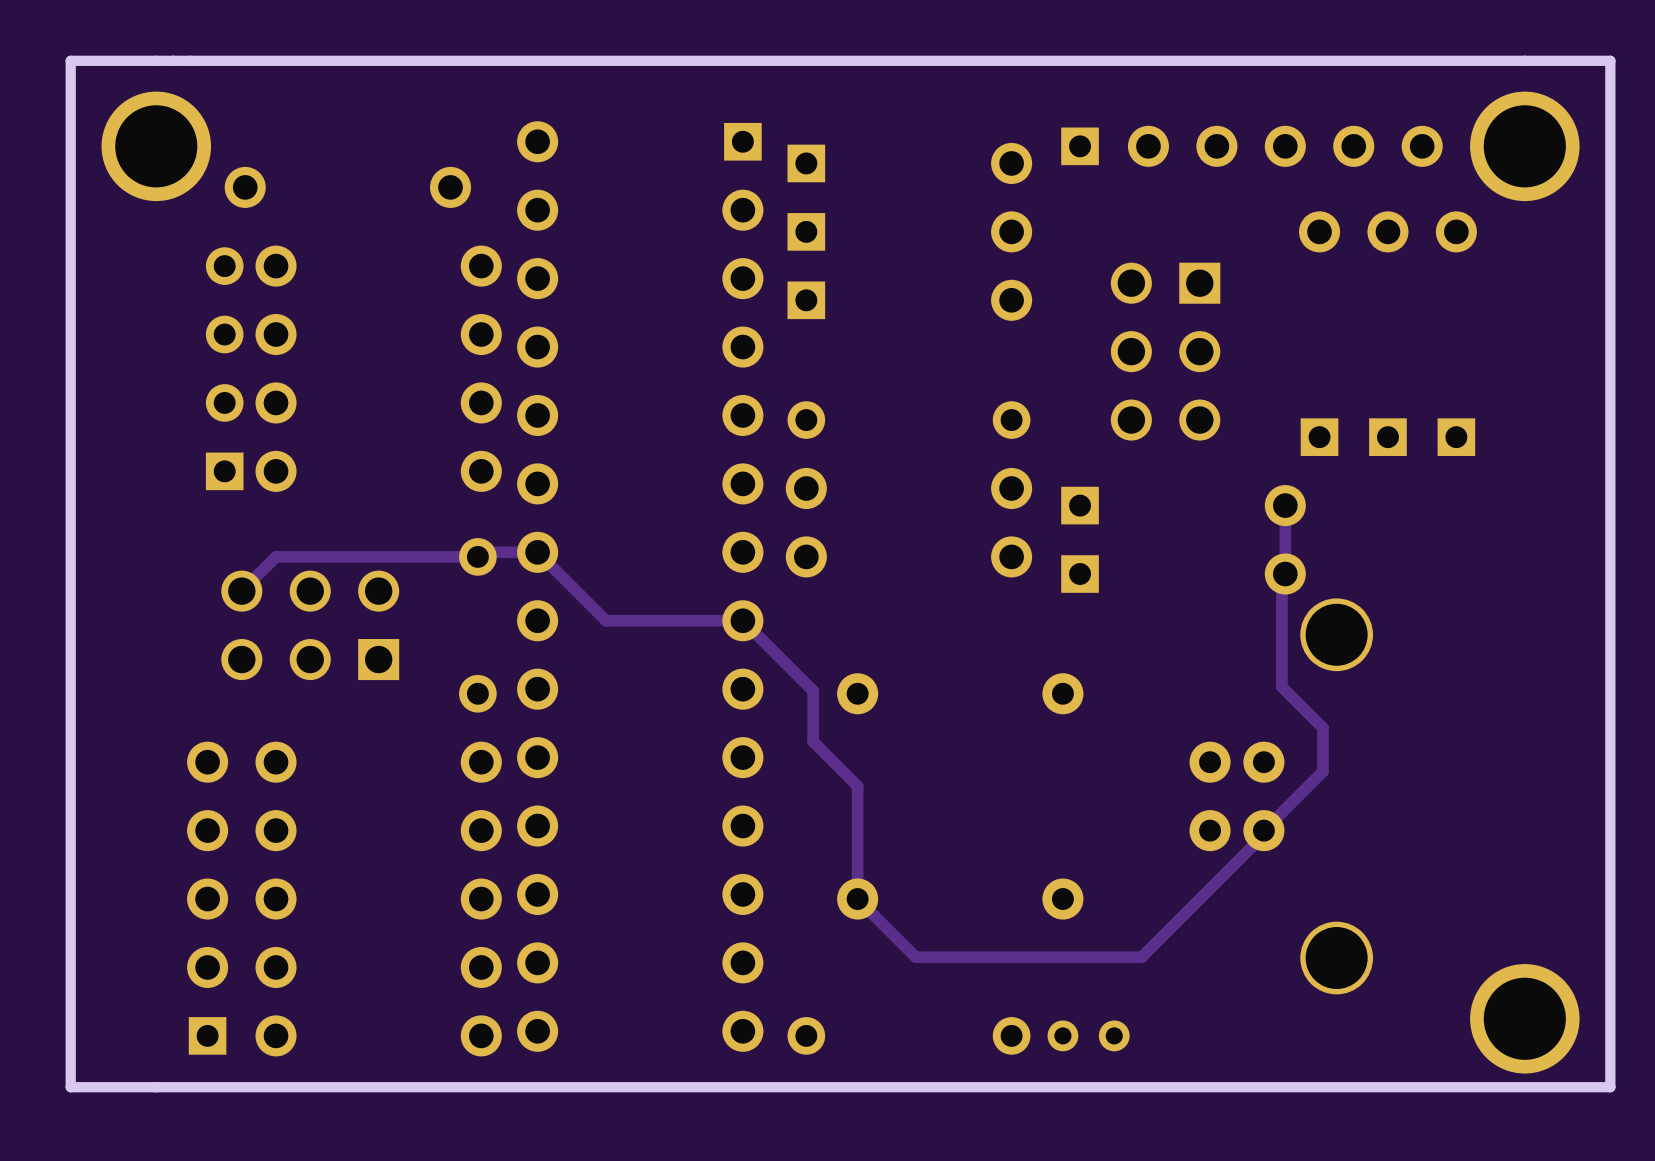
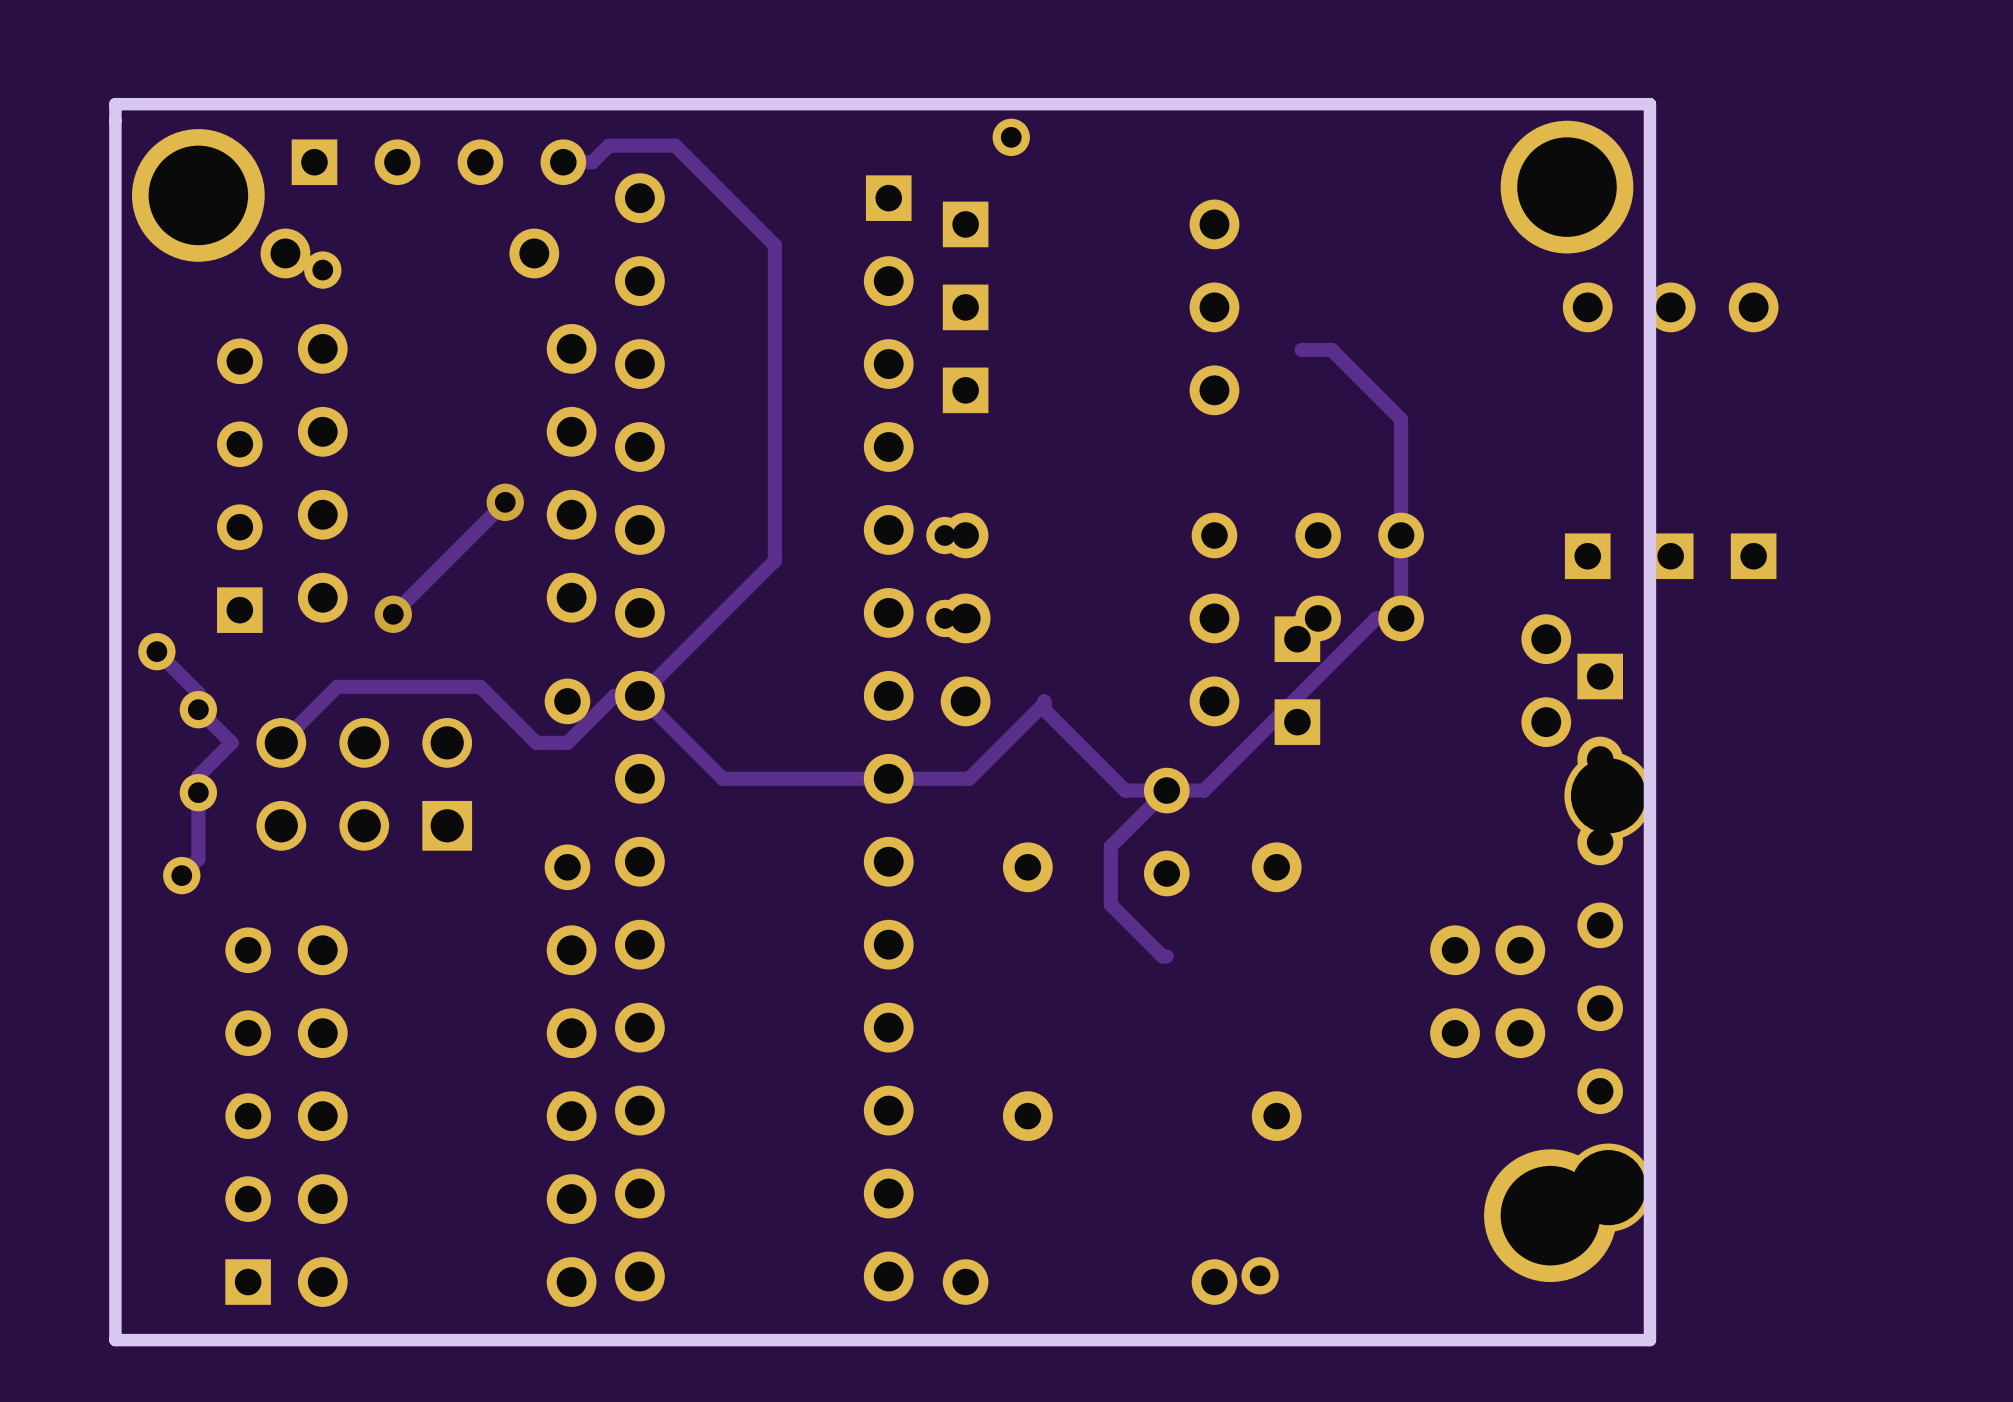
board edge: (1610, 60) (70, 60) (70, 1087) (1610, 1087) (1610, 60) -> (1649, 104) (1649, 1340) (115, 1340) (115, 104) (1649, 104)
part: none -> (1011, 137)
part: none -> (438, 162)
track: none -> (563, 162) (592, 162) (608, 145) (675, 145) (774, 245) (774, 560) (639, 695)
part position: (156, 146) -> (198, 195)
part: (1251, 146) -> none
part position: (1524, 146) -> (1567, 187)
part: none -> (322, 270)
track: none -> (1301, 349) (1331, 349) (1401, 419) (1401, 618) (1376, 618) (1204, 790) (1125, 790) (1044, 709) (1044, 701)
part: (1165, 351) -> none
part position: (224, 368) -> (239, 485)
track: none -> (505, 502) (393, 614)
via: none -> (505, 502)
part: none -> (944, 535)
part: none -> (1359, 535)
via: none -> (393, 614)
part: none -> (944, 618)
part: none -> (1359, 618)
track: (1285, 505) (1285, 574) (1281, 577) (1281, 686) (1322, 727) (1322, 771) (1263, 830) (1263, 834) (1141, 957) (915, 957) (857, 899) (857, 786) (813, 741) (813, 691) (742, 620) -> (1044, 703) (969, 778) (888, 778)
track: none -> (156, 651) (198, 693) (198, 709) (231, 742) (198, 776) (198, 859) (181, 875)
part: none -> (156, 651)
track: (516, 552) (482, 552) (477, 556) (276, 556) -> (614, 695) (567, 742) (536, 742) (480, 686) (337, 686) (322, 701)
part: none -> (198, 709)
track: none -> (1166, 790) (1110, 846) (1110, 904) (1162, 956) (1166, 956)
part: none -> (198, 792)
part: none -> (1166, 832)
part: none -> (181, 875)
part: none -> (1600, 883)
part footprint: [187, 741, 229, 1055] -> [225, 927, 271, 1305]
part position: (1524, 1018) -> (1550, 1215)
part position: (1062, 1035) -> (1260, 1275)
part: (1114, 1035) -> none

